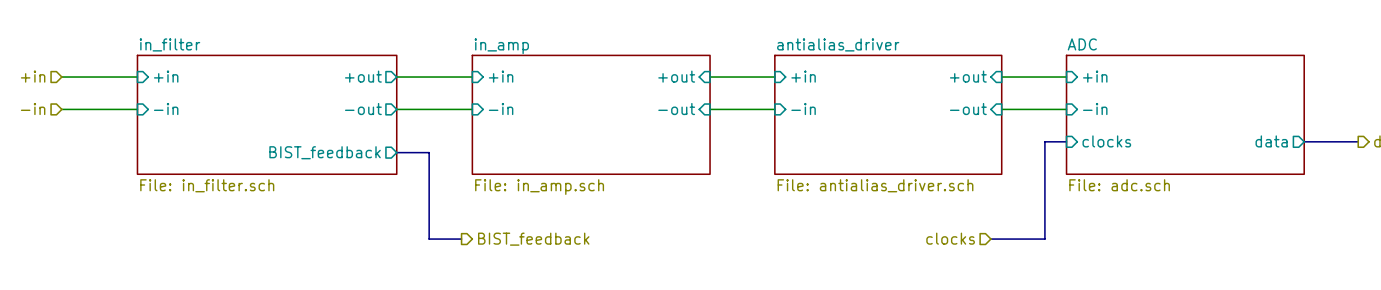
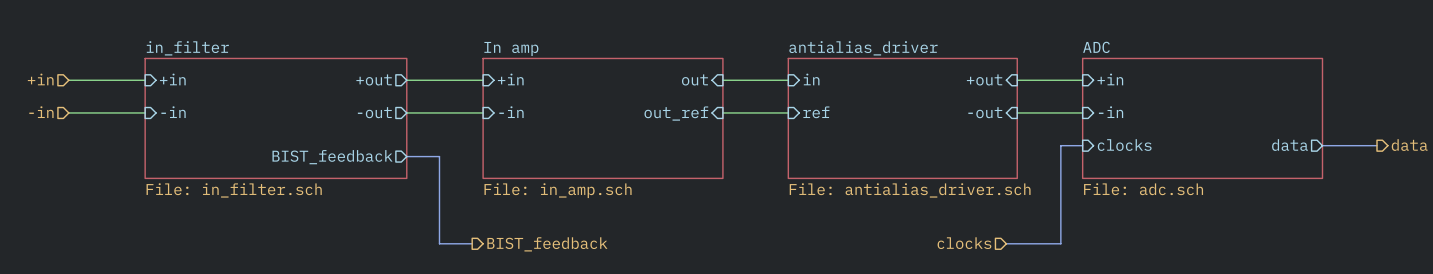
sheet in_amp name: in_amp (501, 46) -> In amp (511, 48)
sheet pin: +out (676, 76) -> out (694, 79)
sheet pin: +in (803, 76) -> in (811, 79)
sheet pin: -out (676, 109) -> out_ref (676, 113)
sheet pin: -in (803, 109) -> ref (816, 112)

